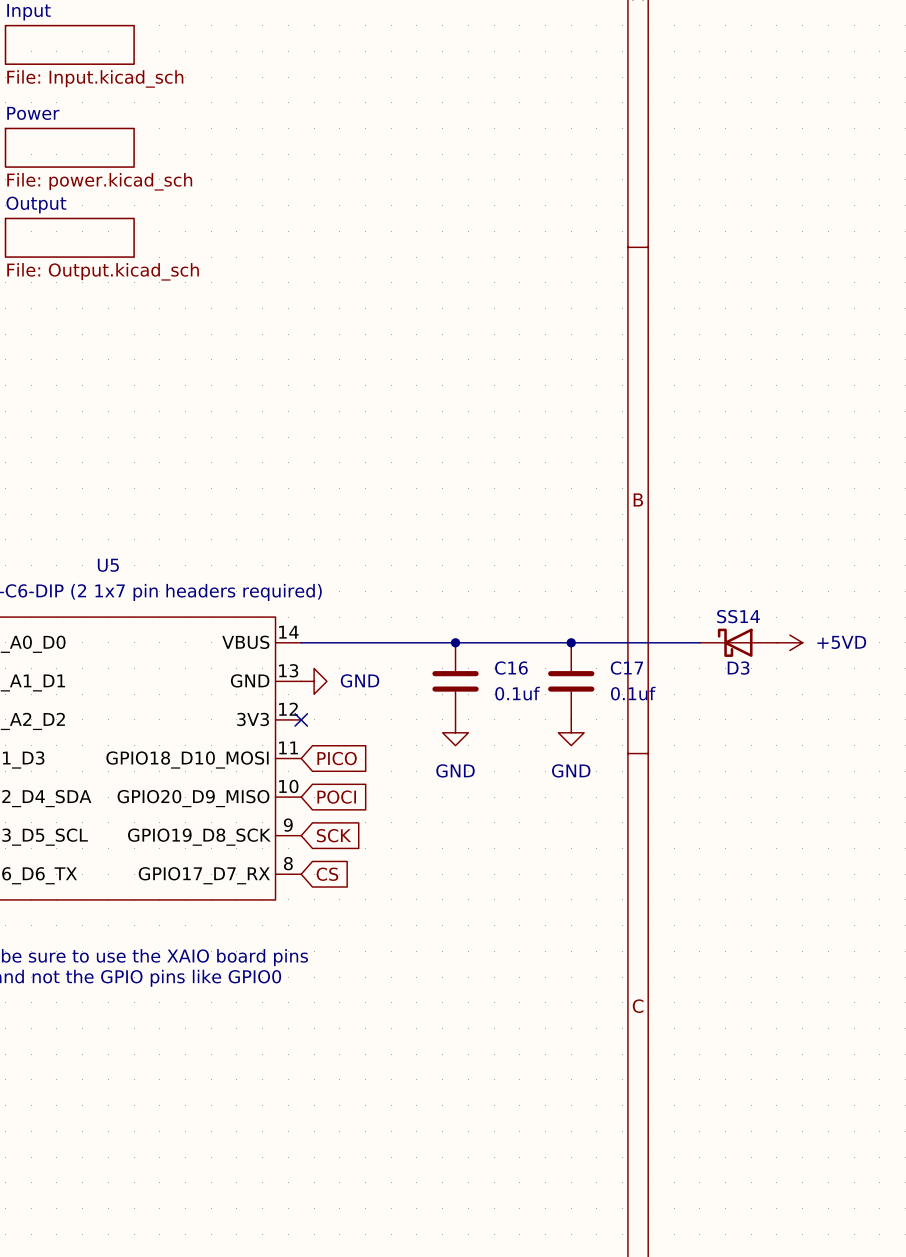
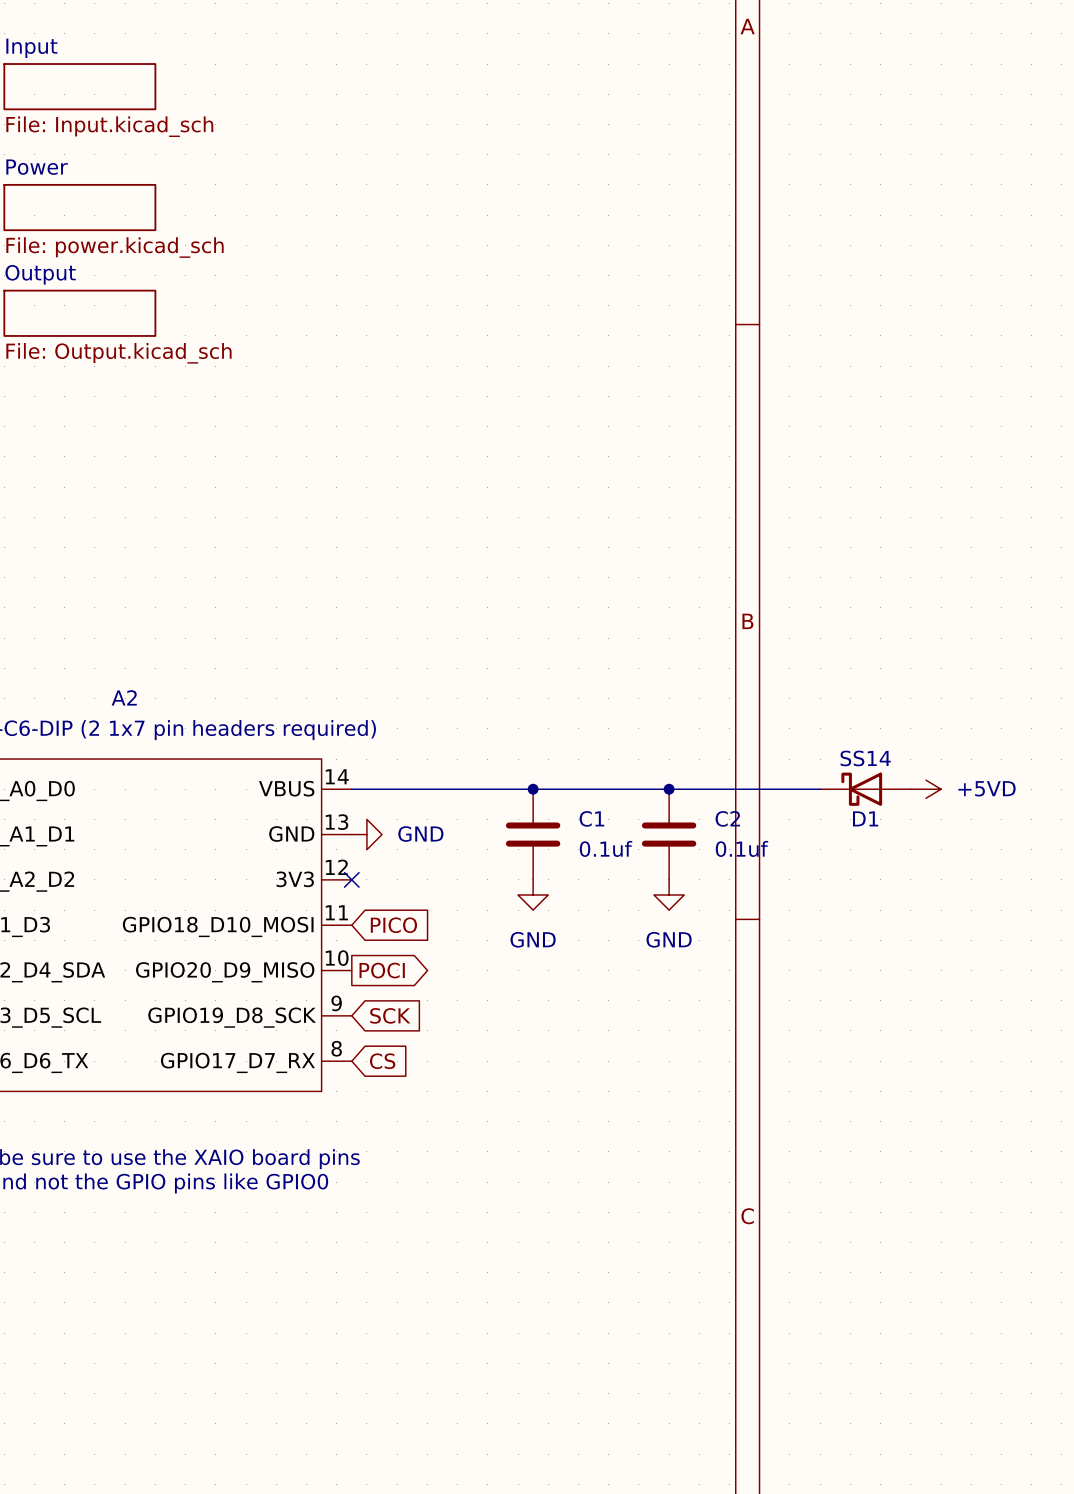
U5 name: U5 (108, 565) -> A2 (124, 697)
C16 name: C16 (511, 668) -> C1 (591, 818)
C17 name: C17 (626, 668) -> C2 (727, 818)
D3 name: D3 (738, 668) -> D1 (865, 818)
global label shape: input (336, 797) -> output (382, 970)

